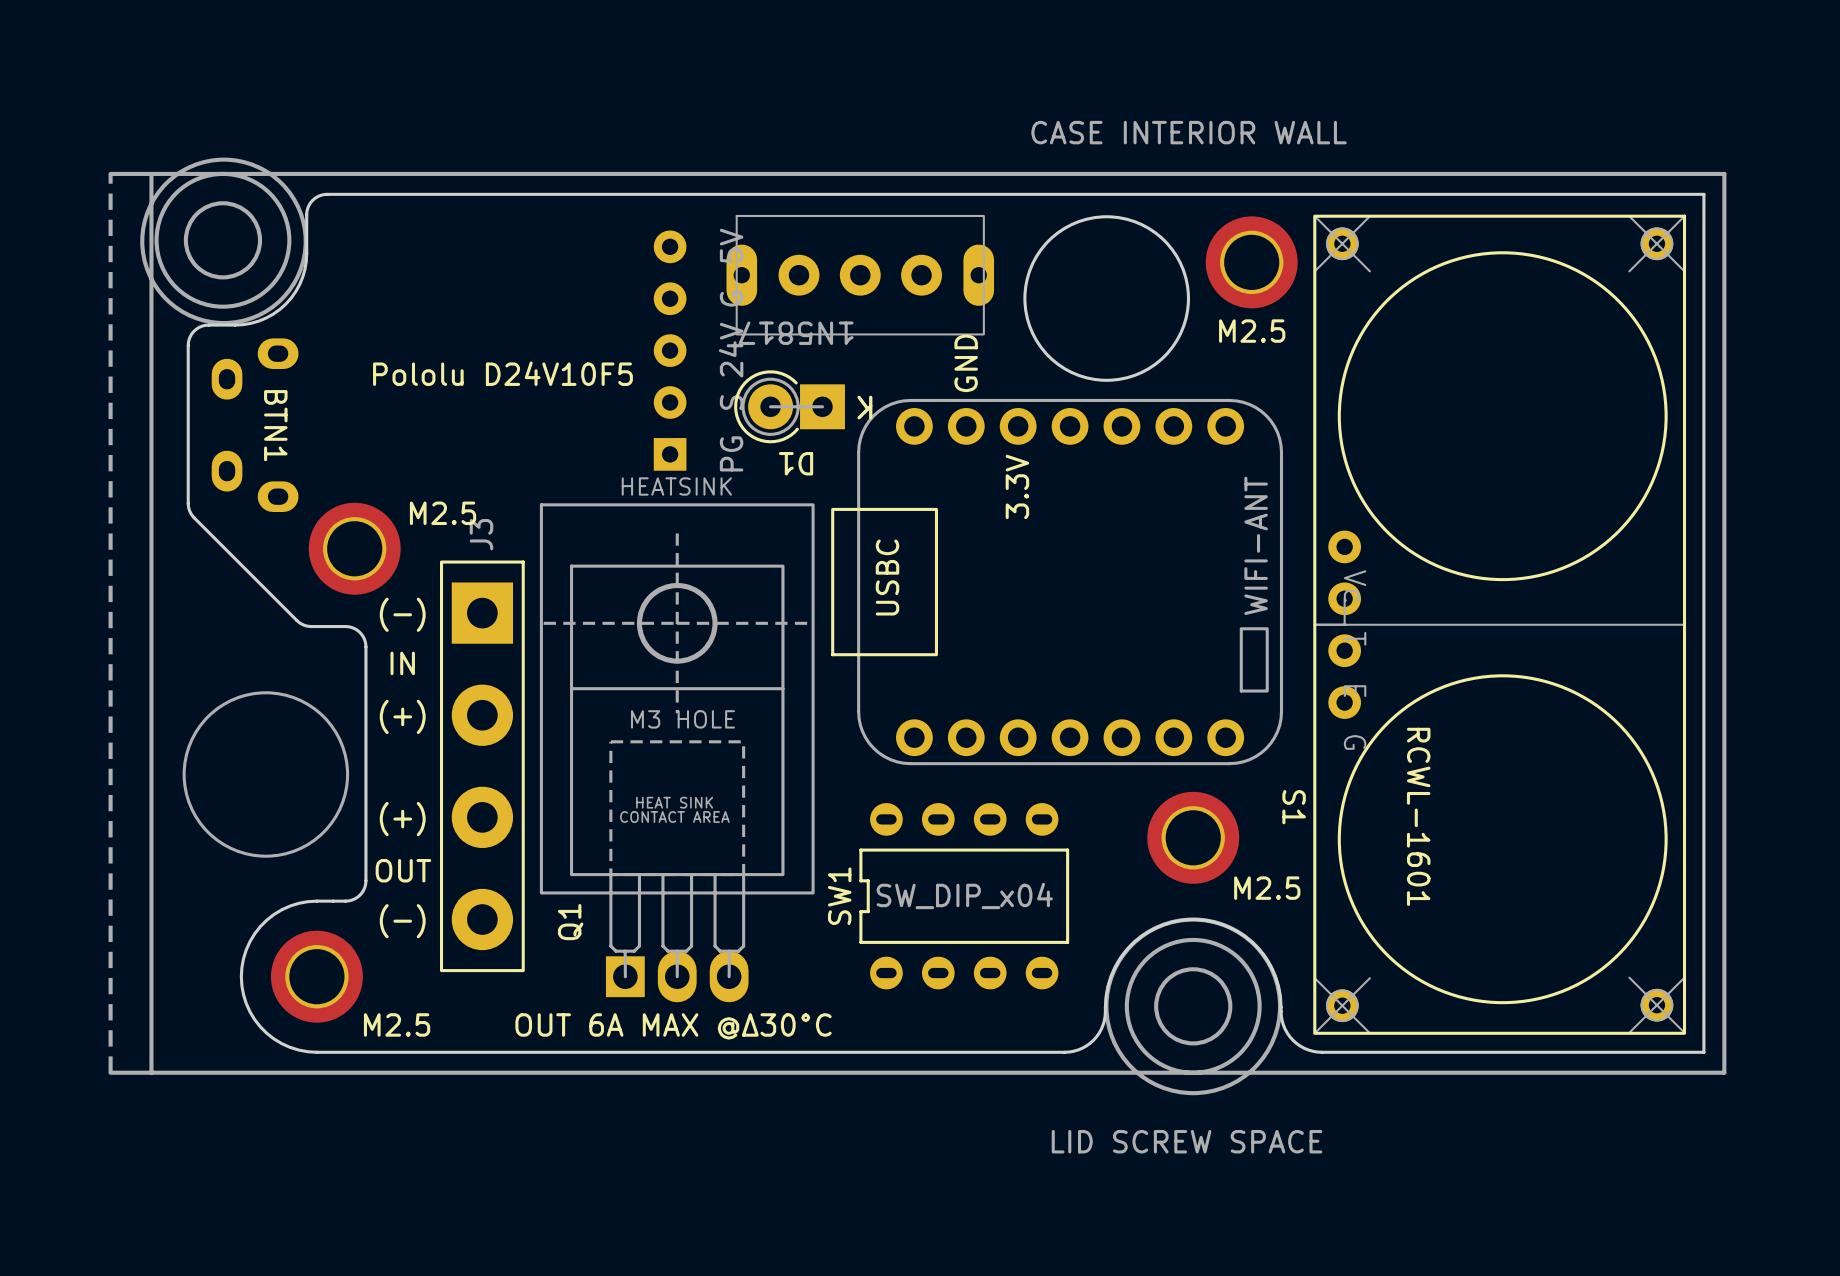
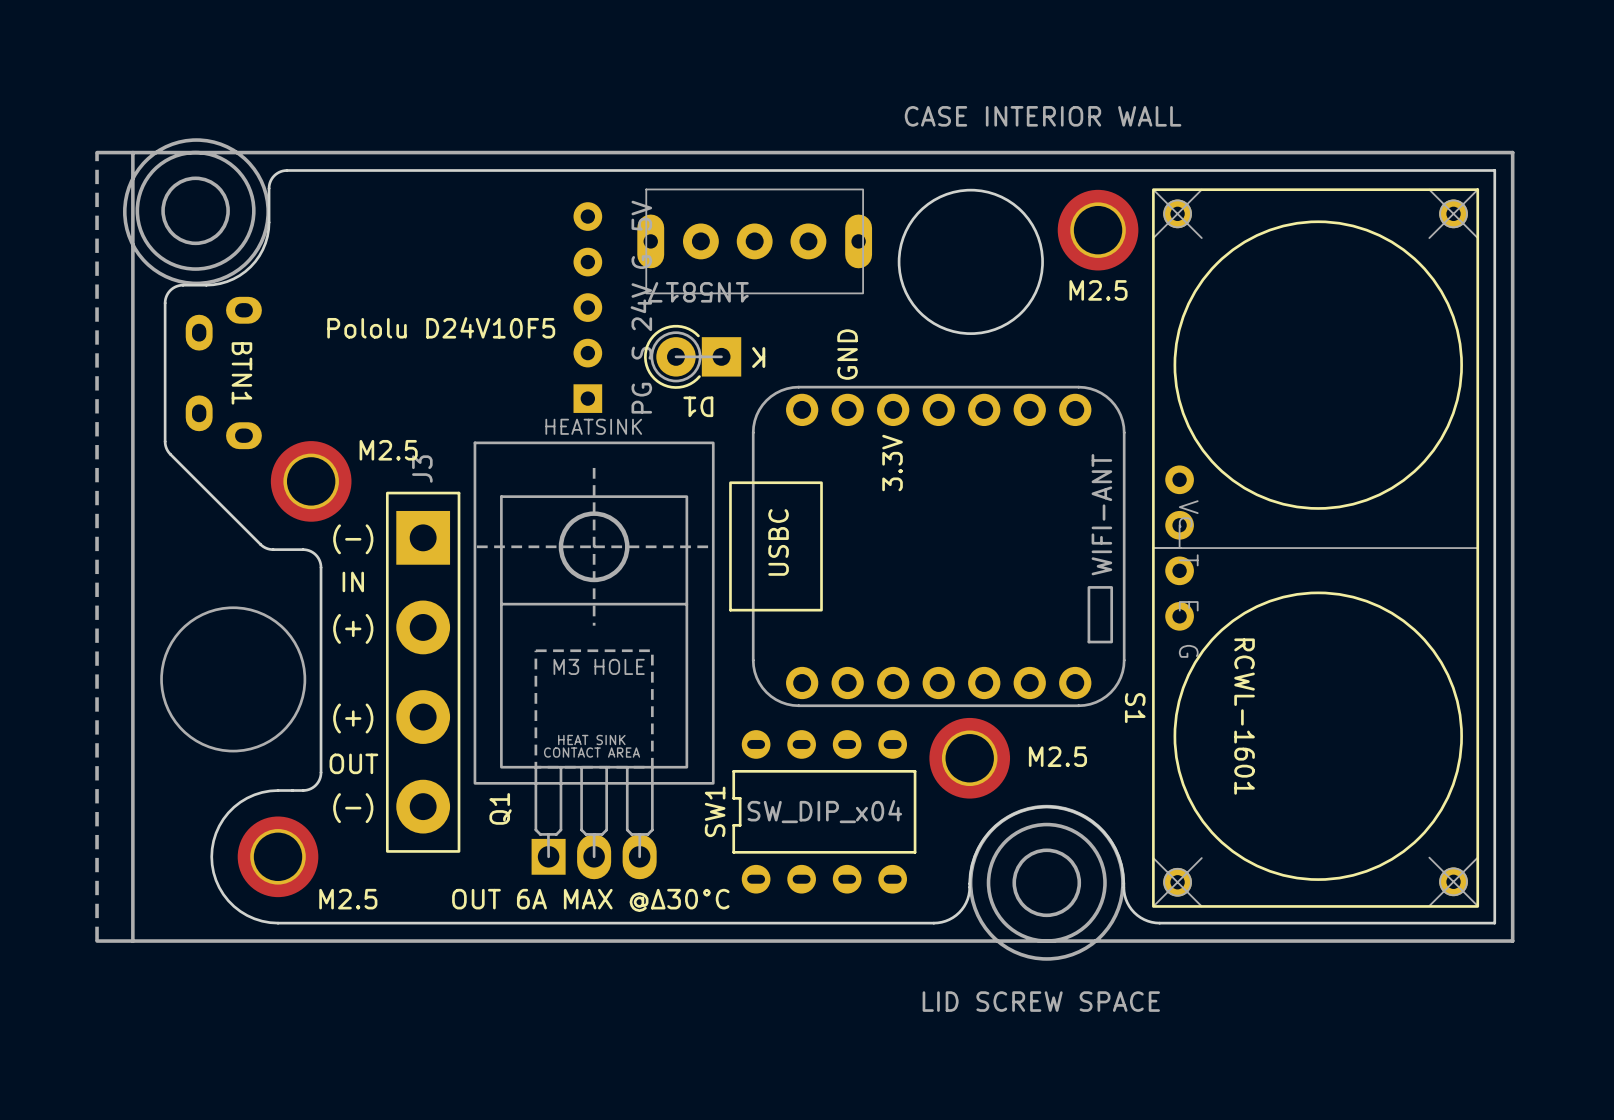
part position: (1057, 582) -> (927, 546)
Q1 text position: M3 HOLE (682, 719) -> M3 HOLE (599, 666)
Q1 text position: HEAT SINK (674, 802) -> HEAT SINK (591, 740)
Q1 text position: CONTACT AREA (674, 817) -> CONTACT AREA (592, 752)
M2.5 position: (1193, 837) -> (969, 758)
M2.5 name position: M2.5 (1267, 888) -> M2.5 (1057, 756)
SW1 position: (964, 896) -> (824, 811)

